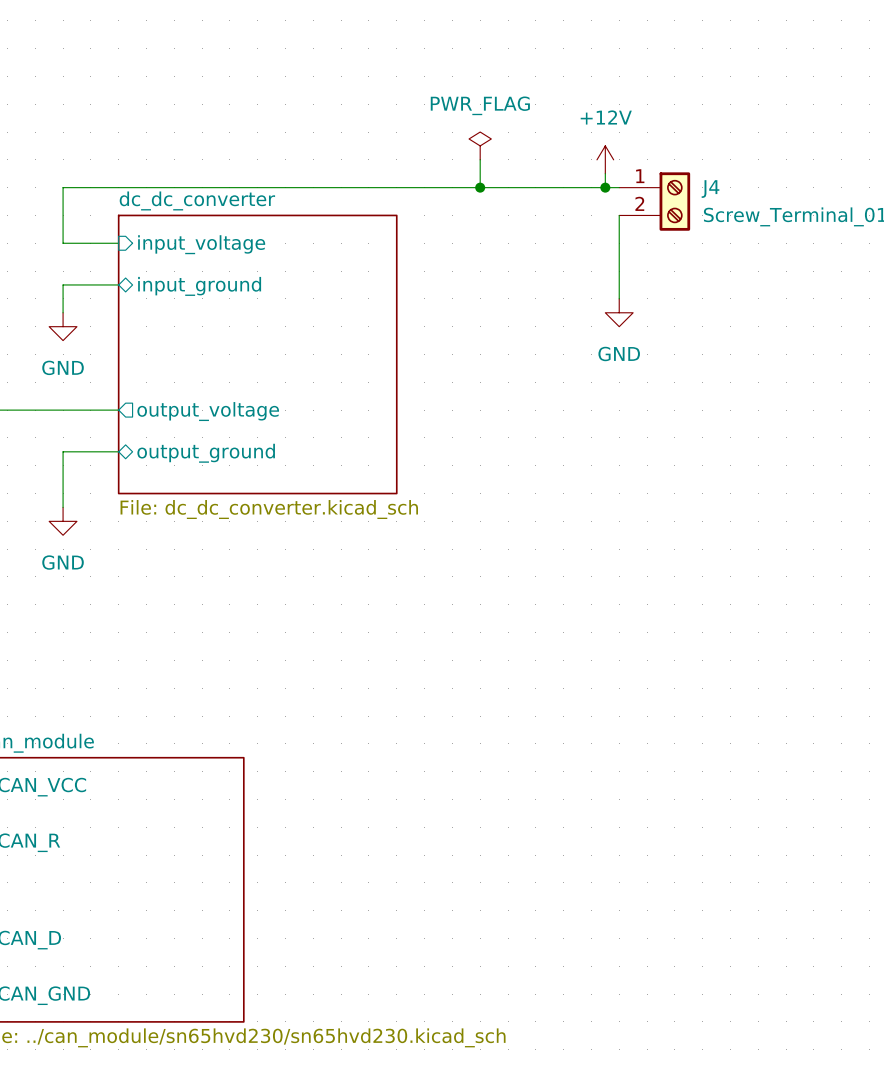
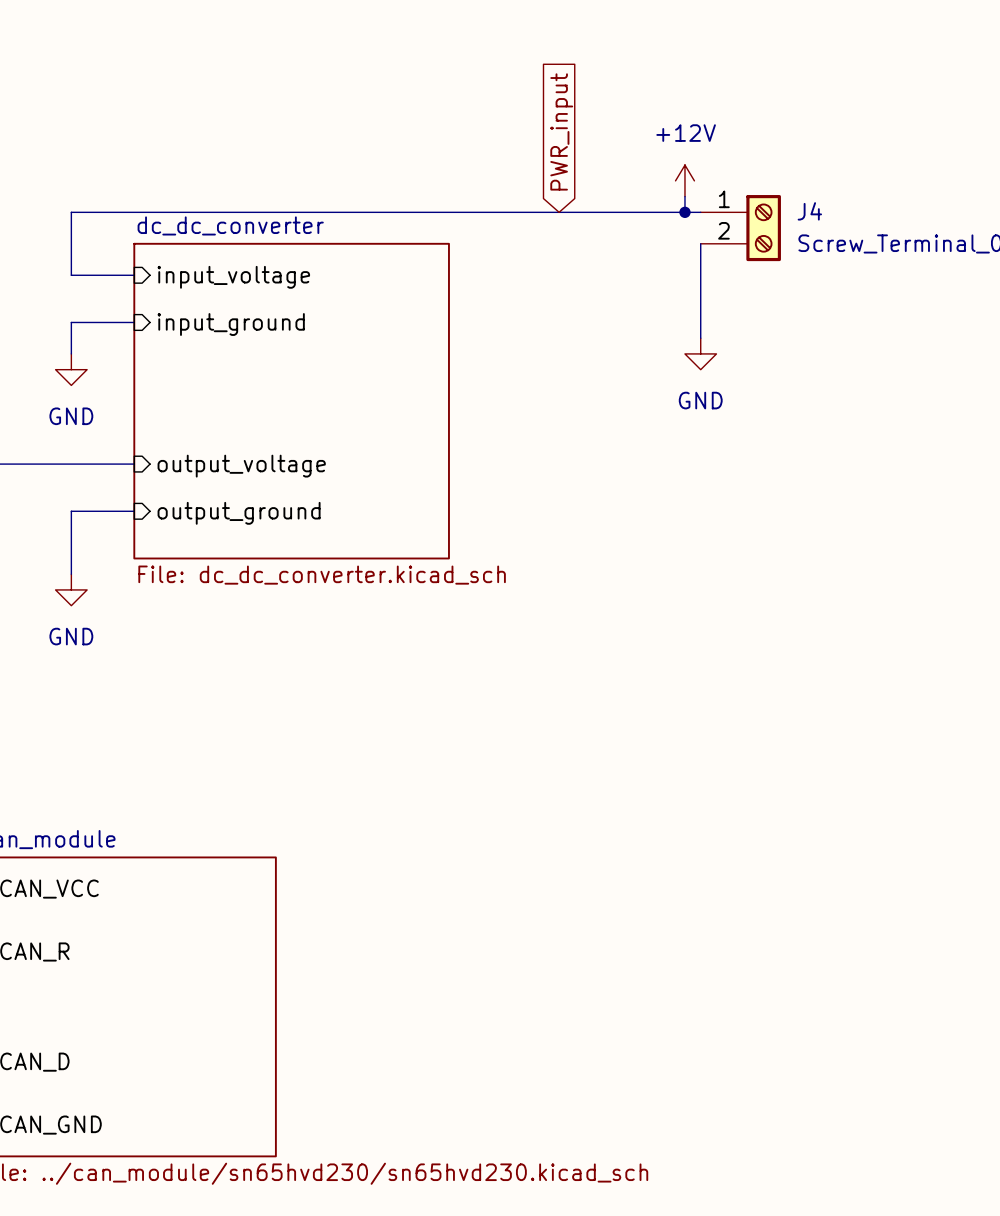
global label: none -> PWR_input (561, 131)
power symbol: PWR_FLAG (480, 145) -> none
junction: (480, 187) -> none
sheet pin shape: bidirectional (199, 286) -> input (231, 324)
sheet pin shape: output (208, 411) -> input (241, 466)
sheet pin shape: bidirectional (206, 453) -> input (239, 513)

